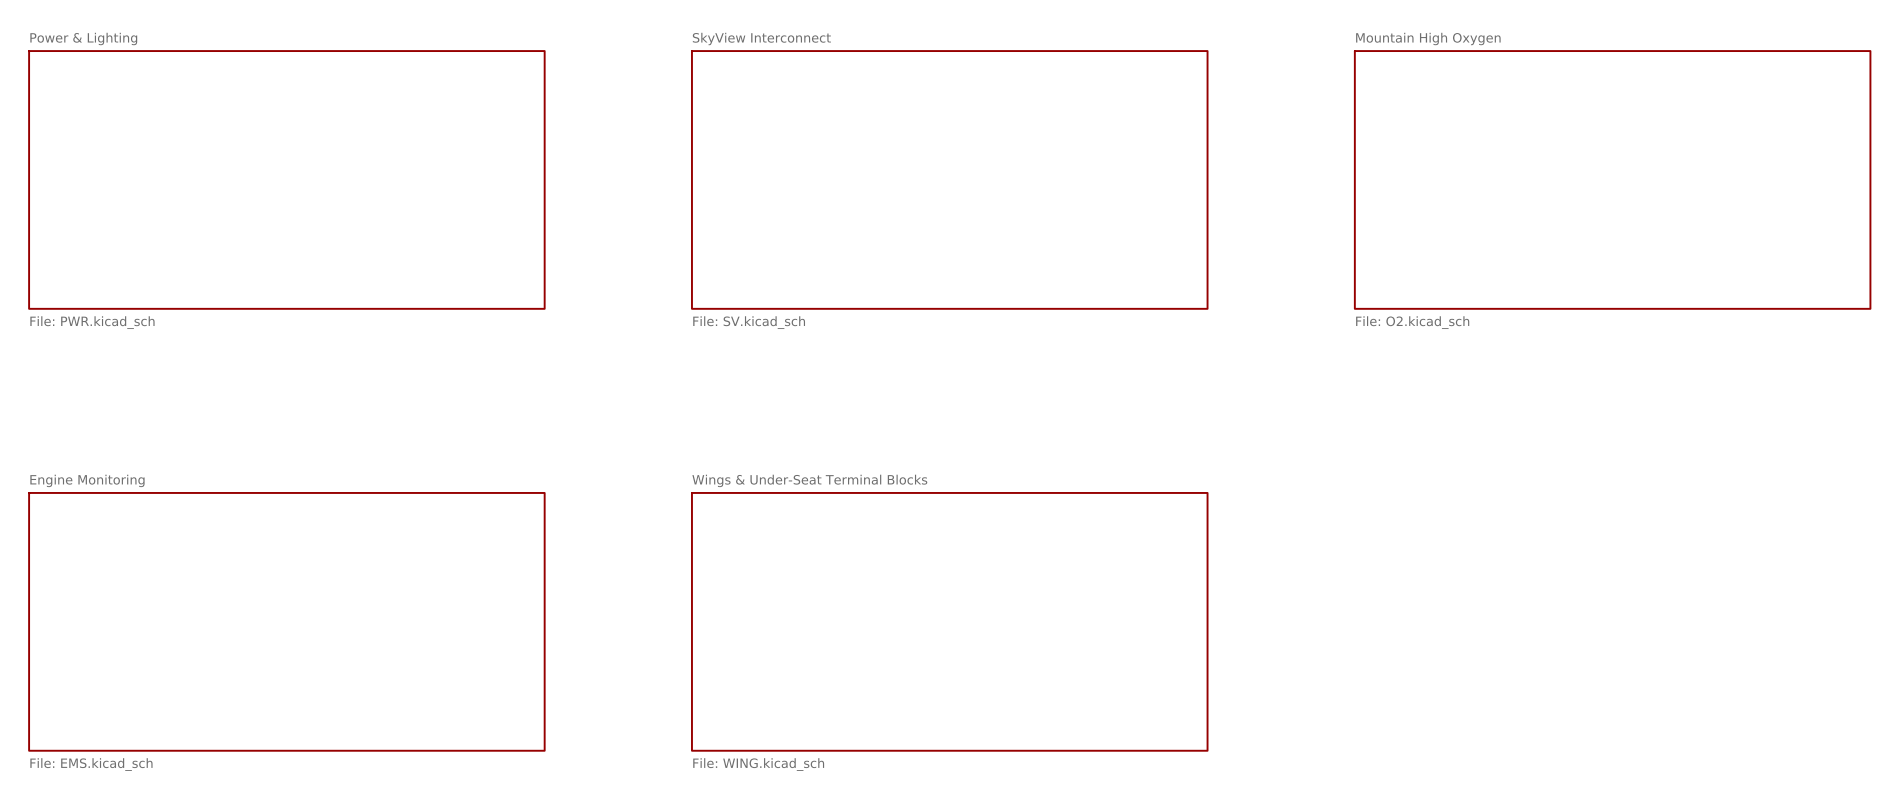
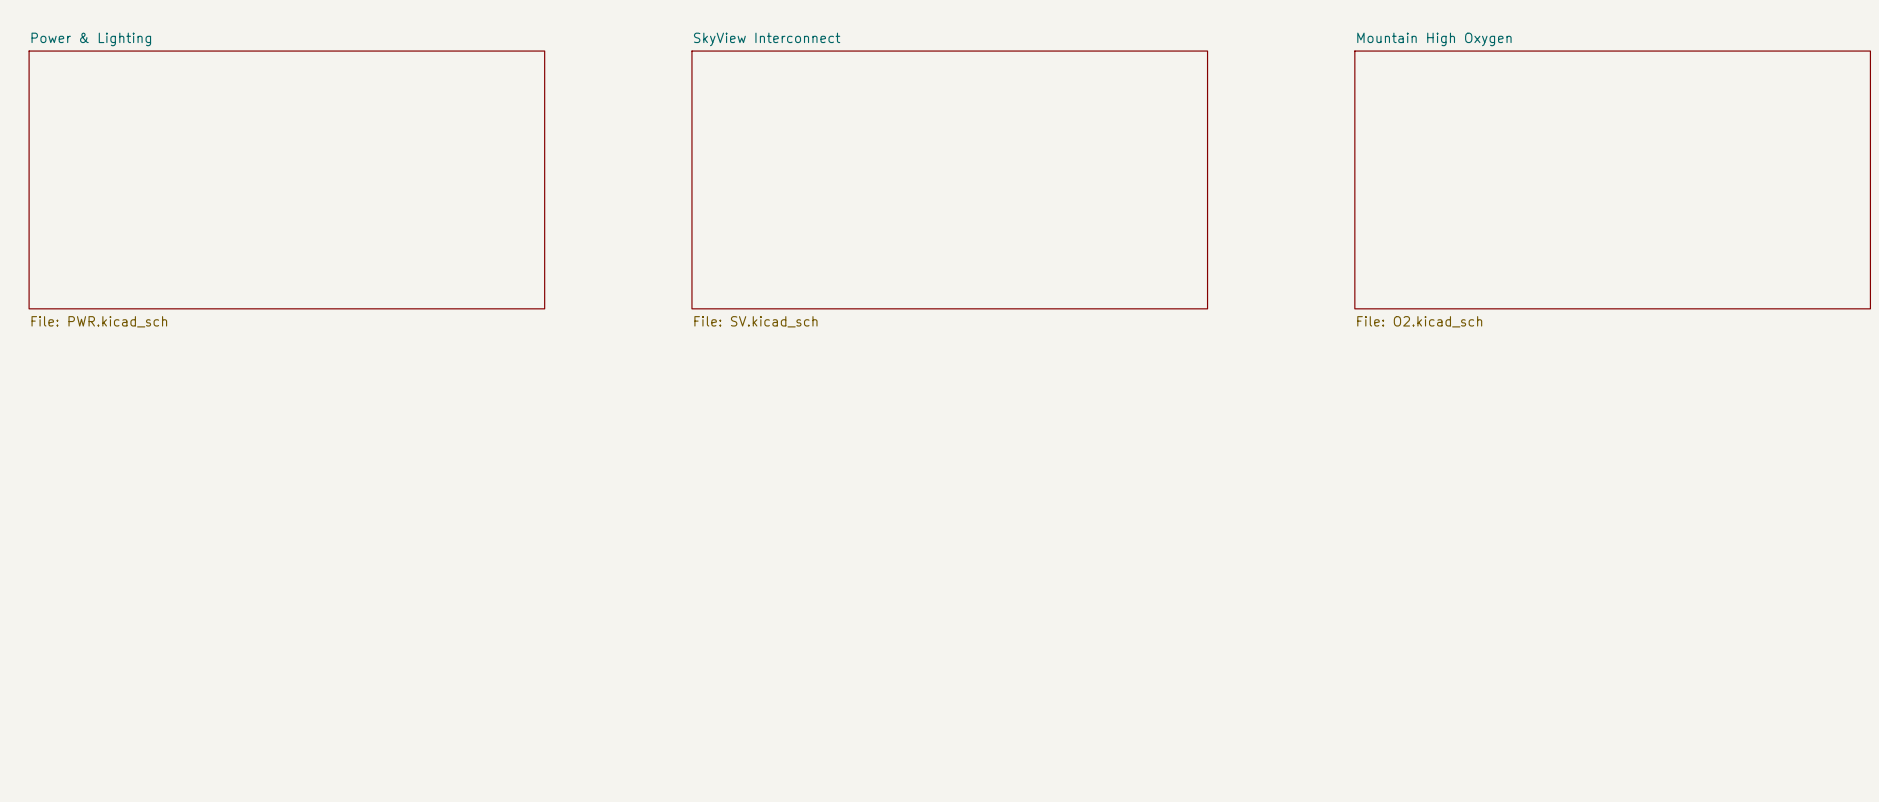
sheet Engine Monitoring: File: EMS.kicad_sch (286, 621) -> none
sheet Wings & Under-Seat Terminal Blocks: File: WING.kicad_sch (949, 621) -> none

